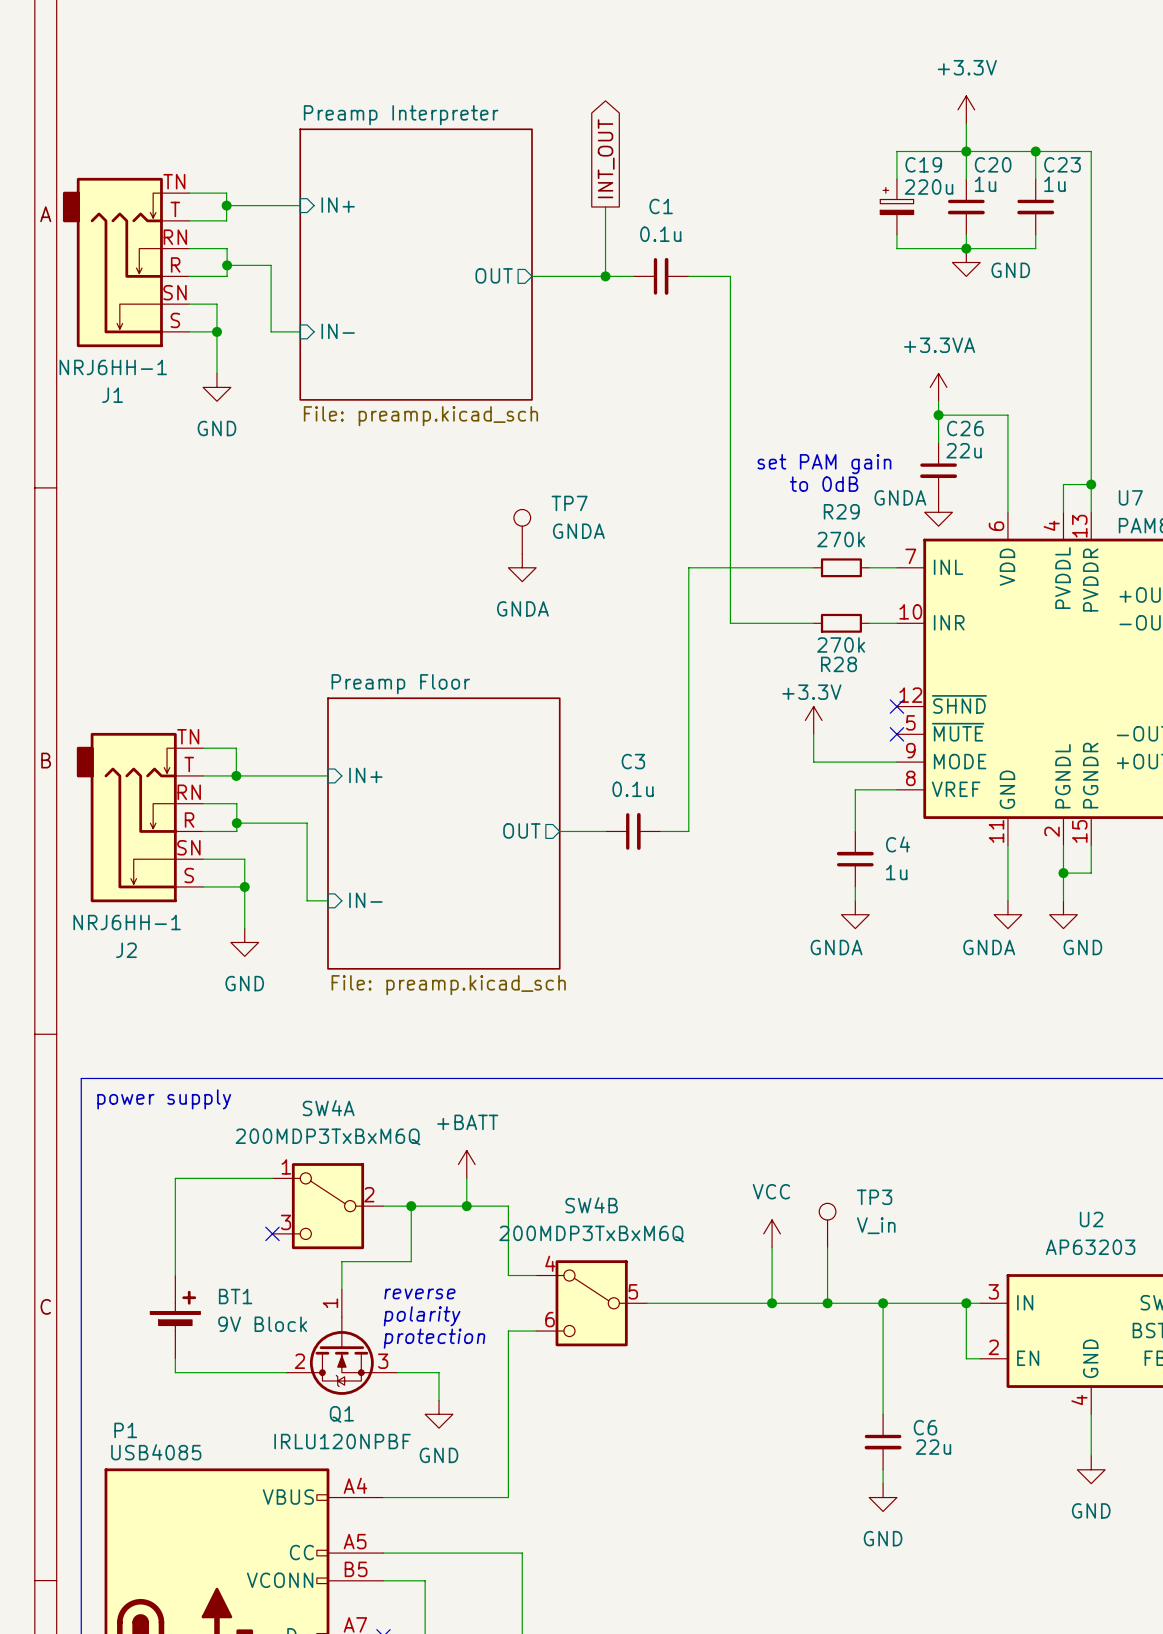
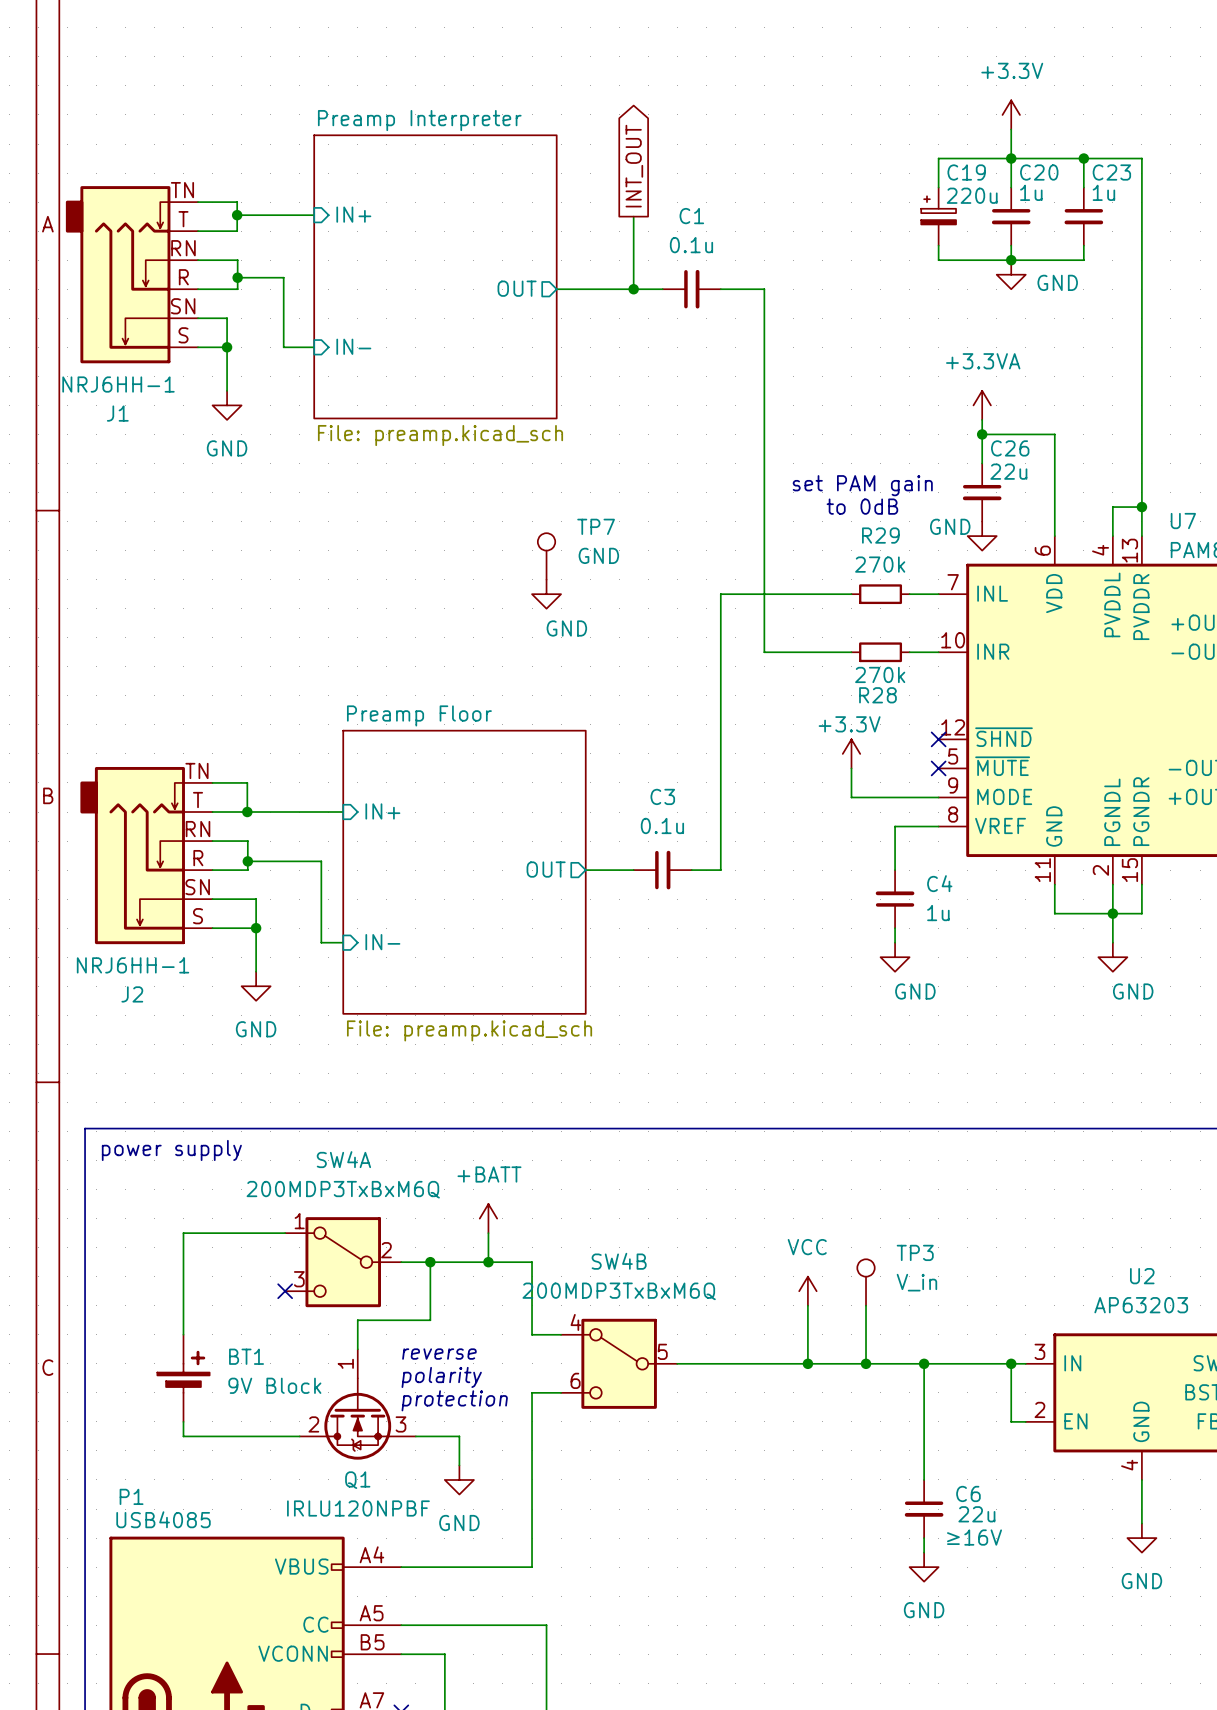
power symbol: GNDA (938, 512) -> GND (982, 536)
TP7 value: GNDA (578, 531) -> GND (598, 555)
power symbol: GNDA (522, 567) -> GND (546, 594)
wire: (1007, 873) (1007, 900) -> (1054, 913) (1112, 913)
power symbol: GNDA (855, 914) -> GND (895, 957)
power symbol: GNDA (1007, 914) -> none
C6 text: none -> ≥16V (974, 1537)

